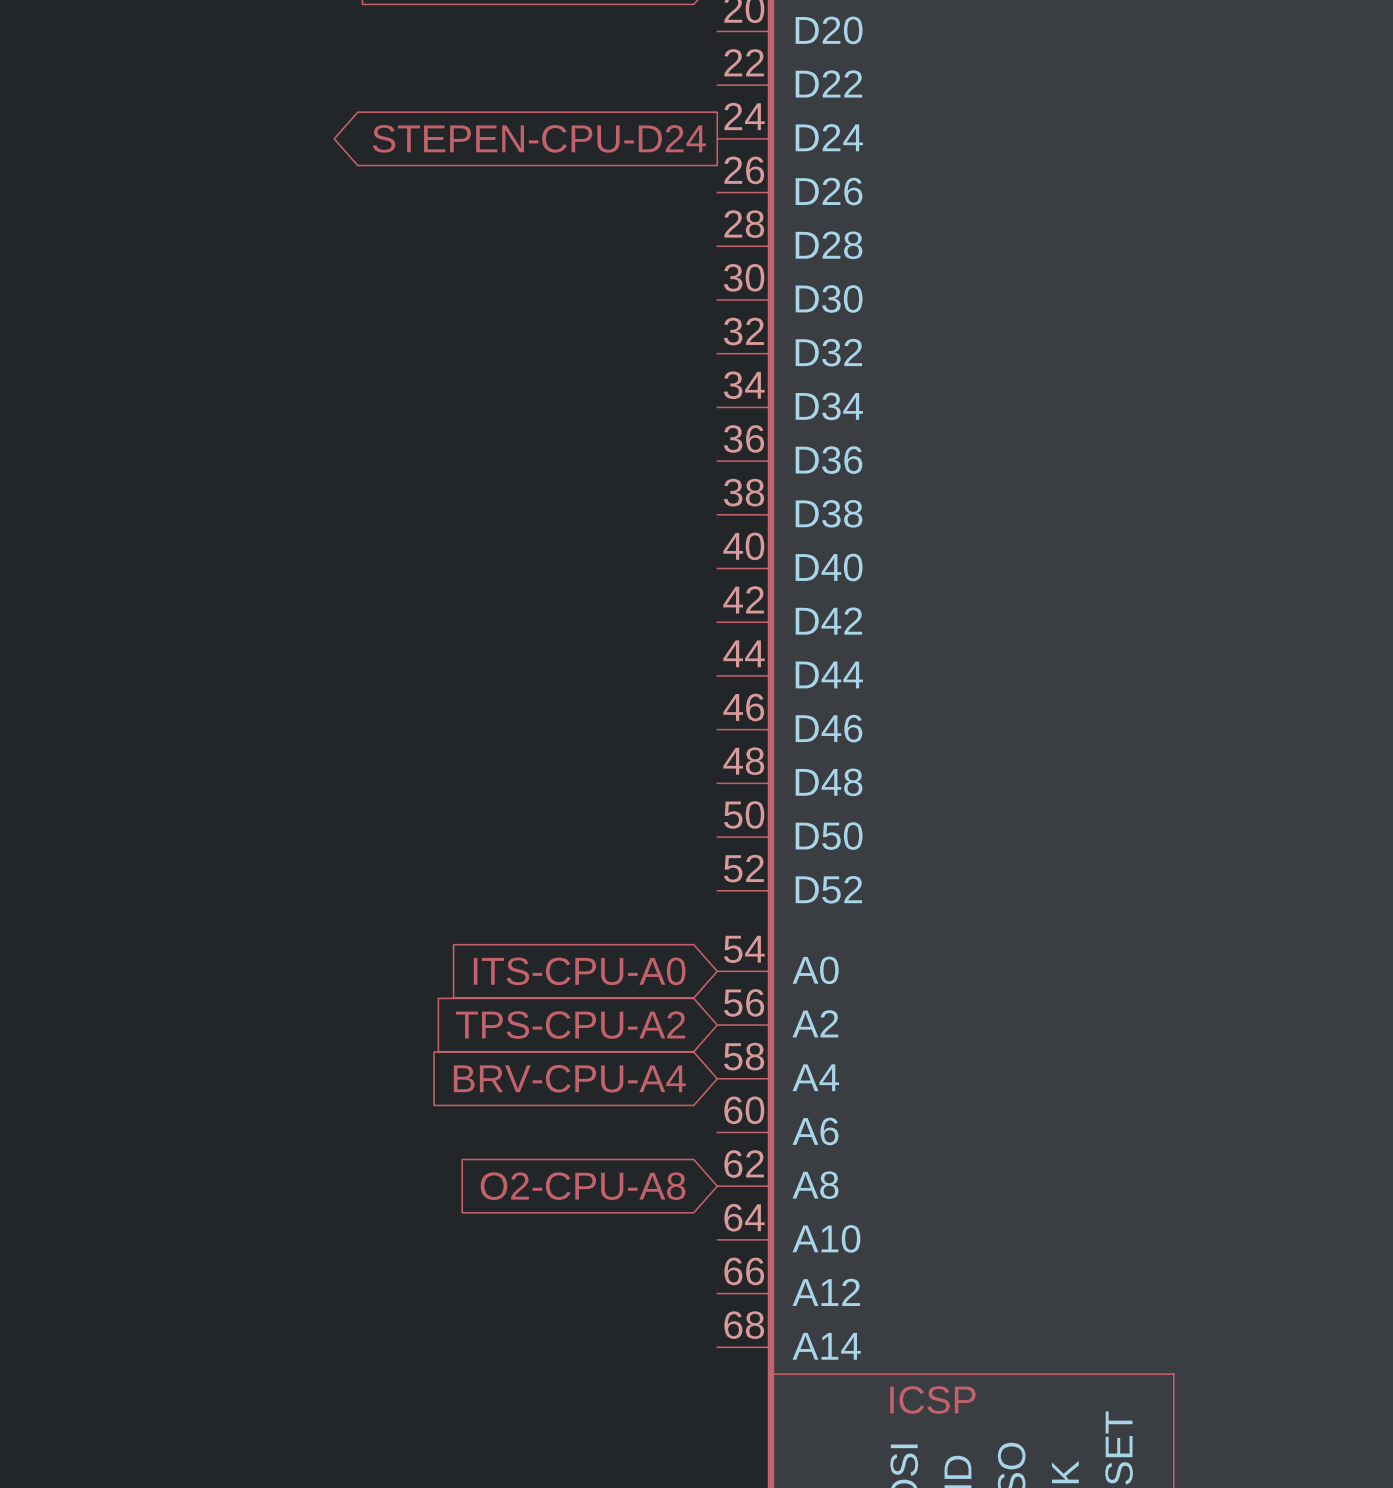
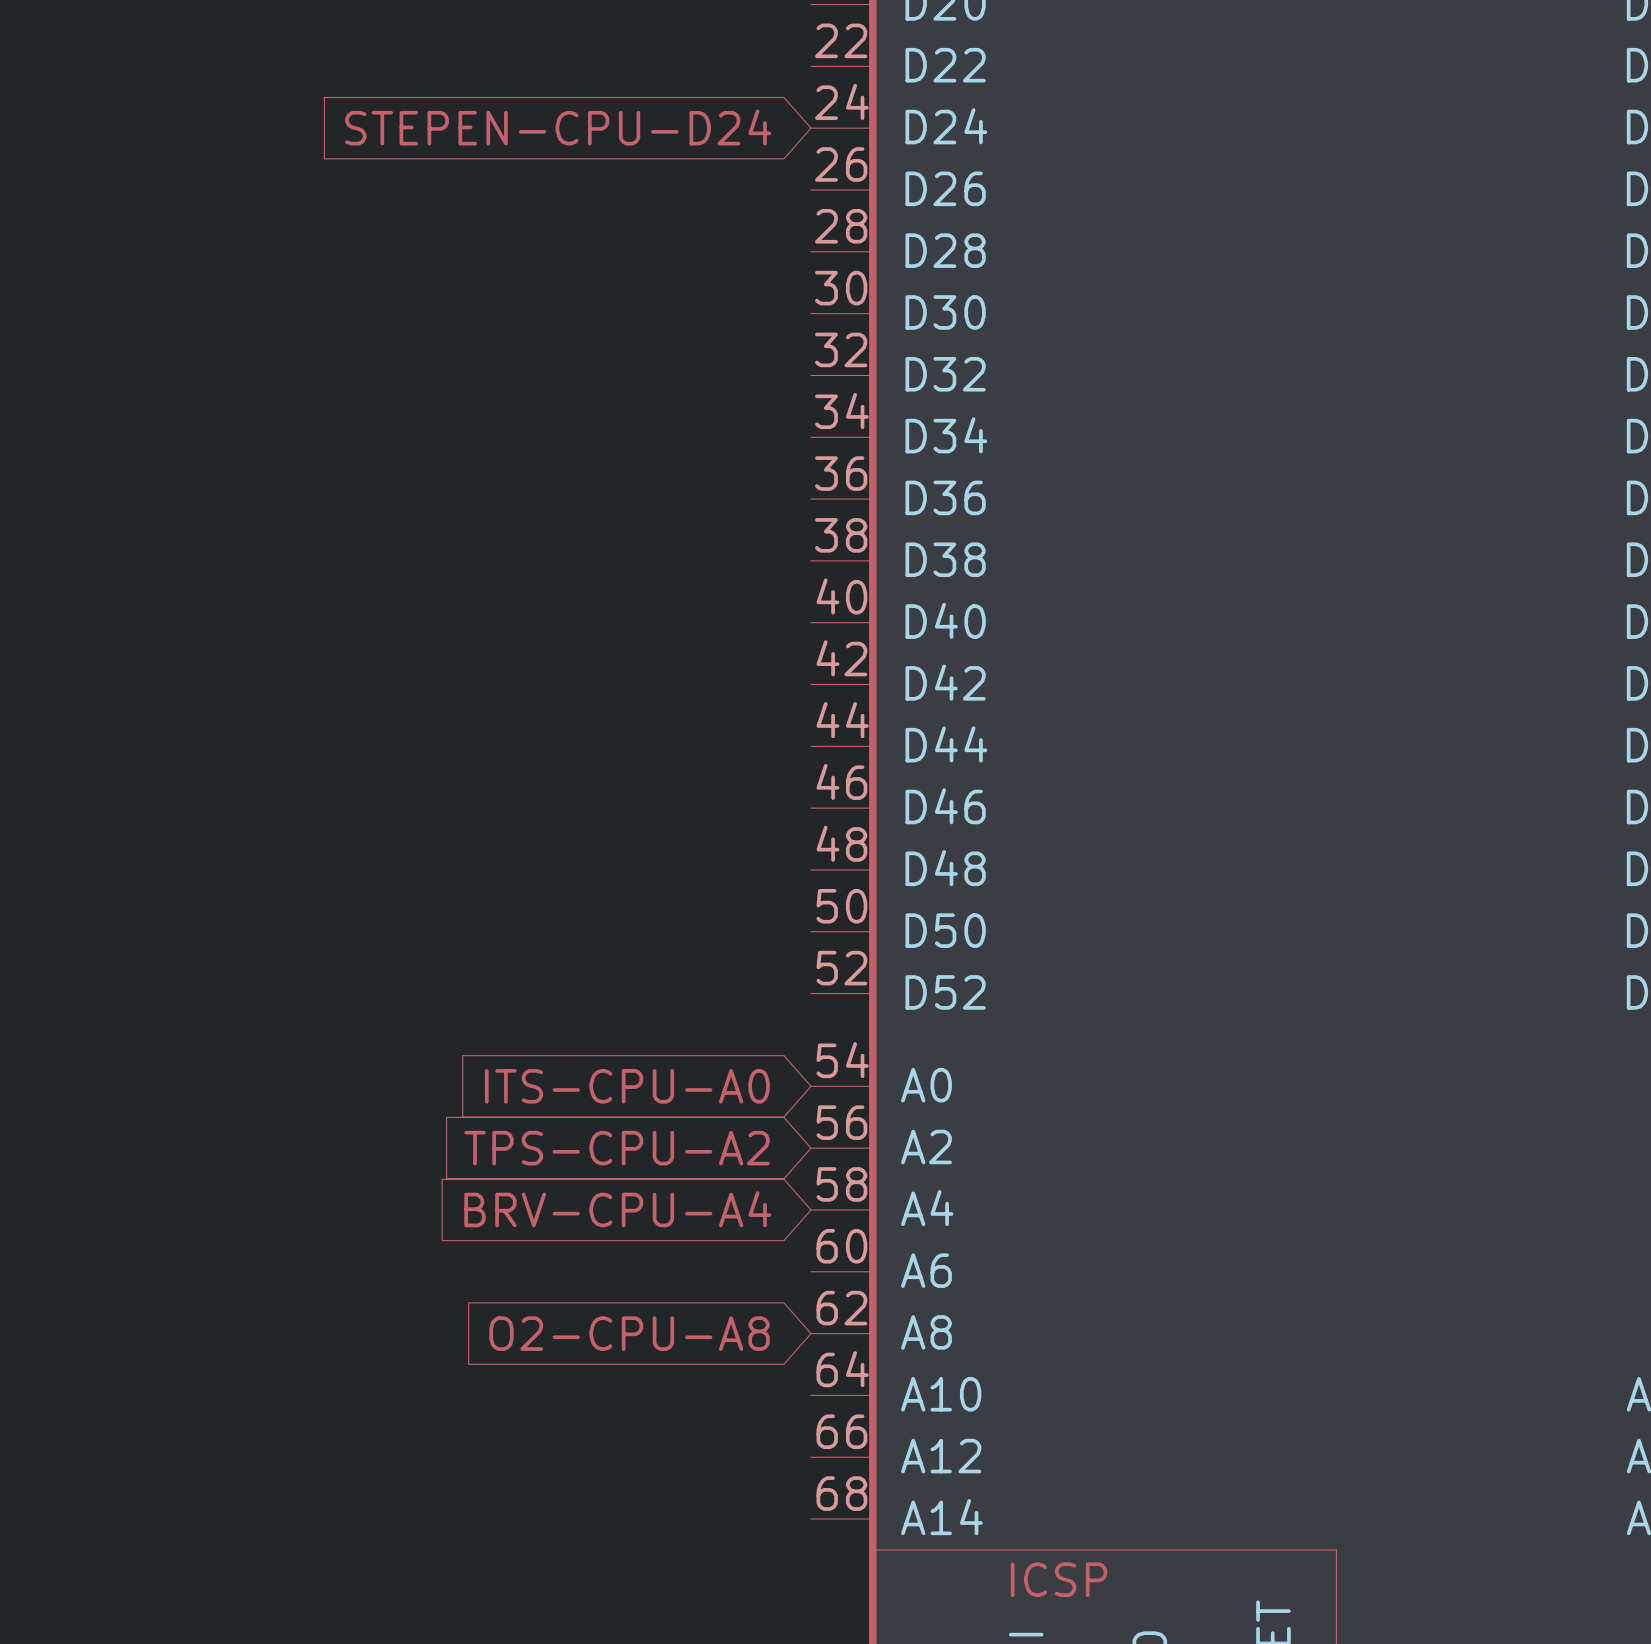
global label shape: output (539, 138) -> input (558, 127)

